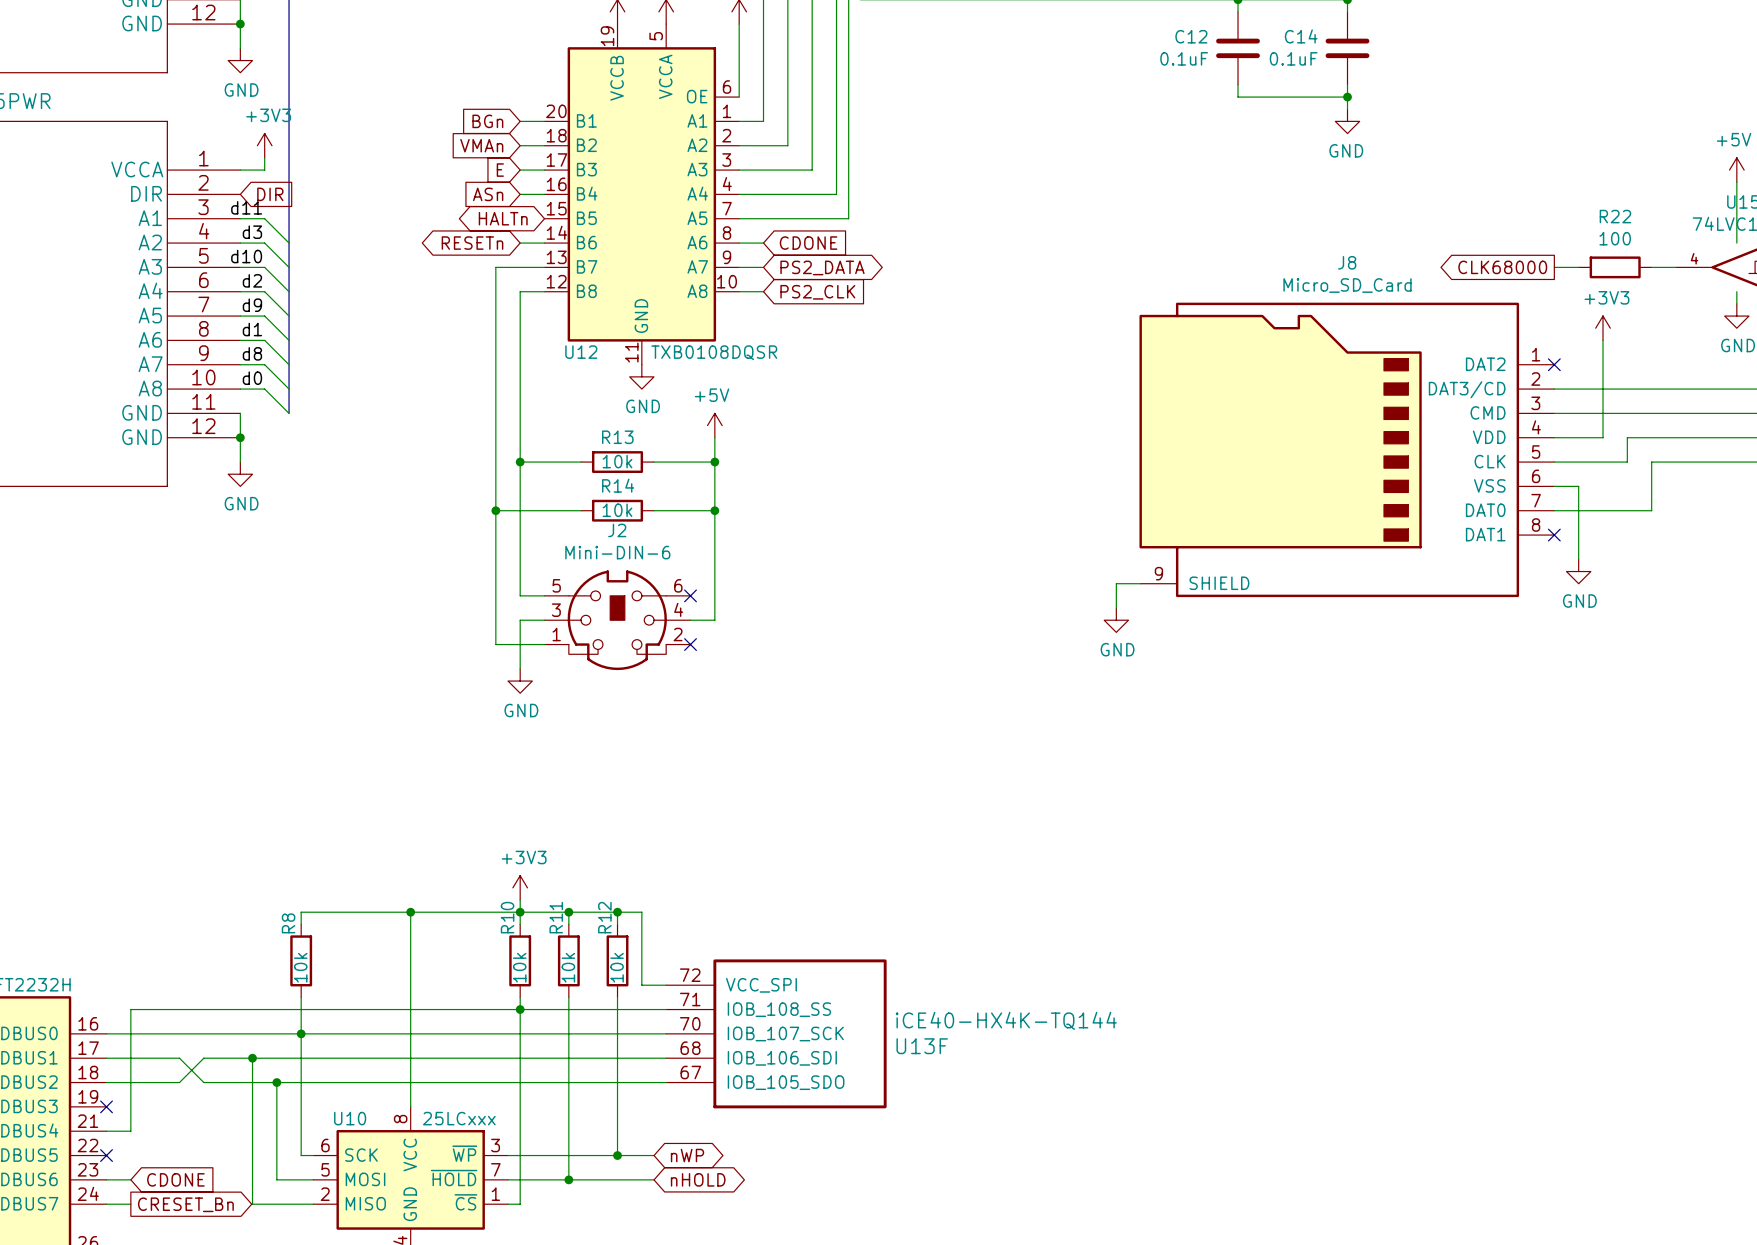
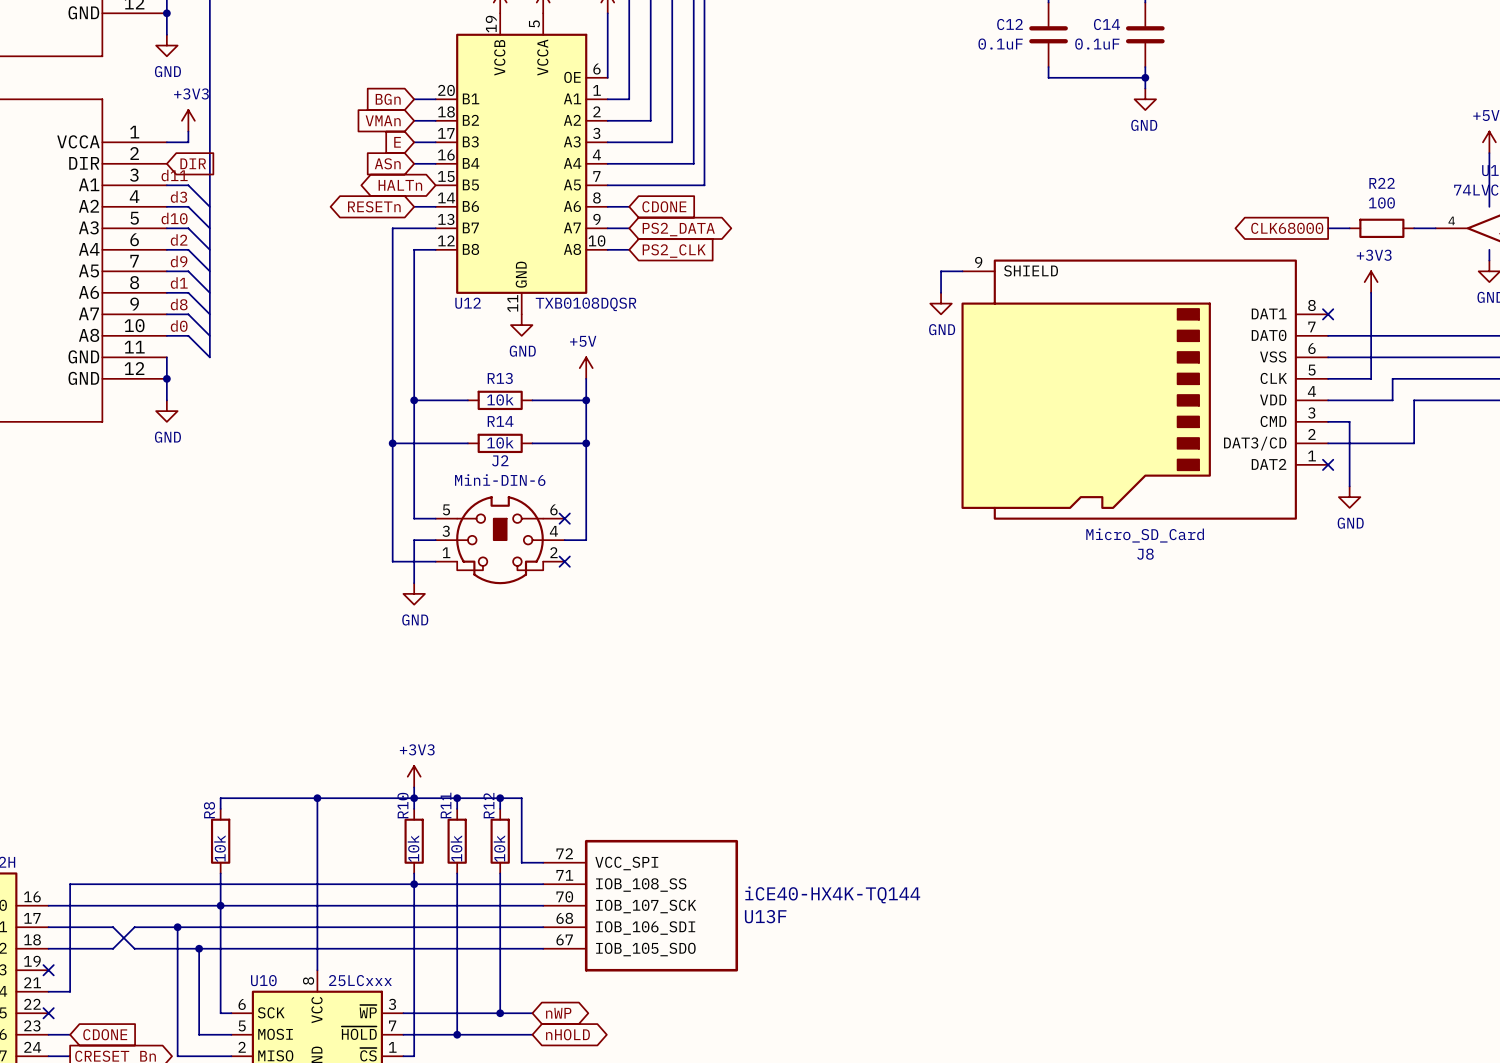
wire: none -> (962, 271) (941, 271) (941, 292)
power symbol: none -> GND (941, 303)
J8 flip: as is (1329, 449) -> up-down (1129, 389)
wire: (1140, 583) (1116, 583) (1116, 608) -> none
power symbol: GND (1116, 620) -> none

